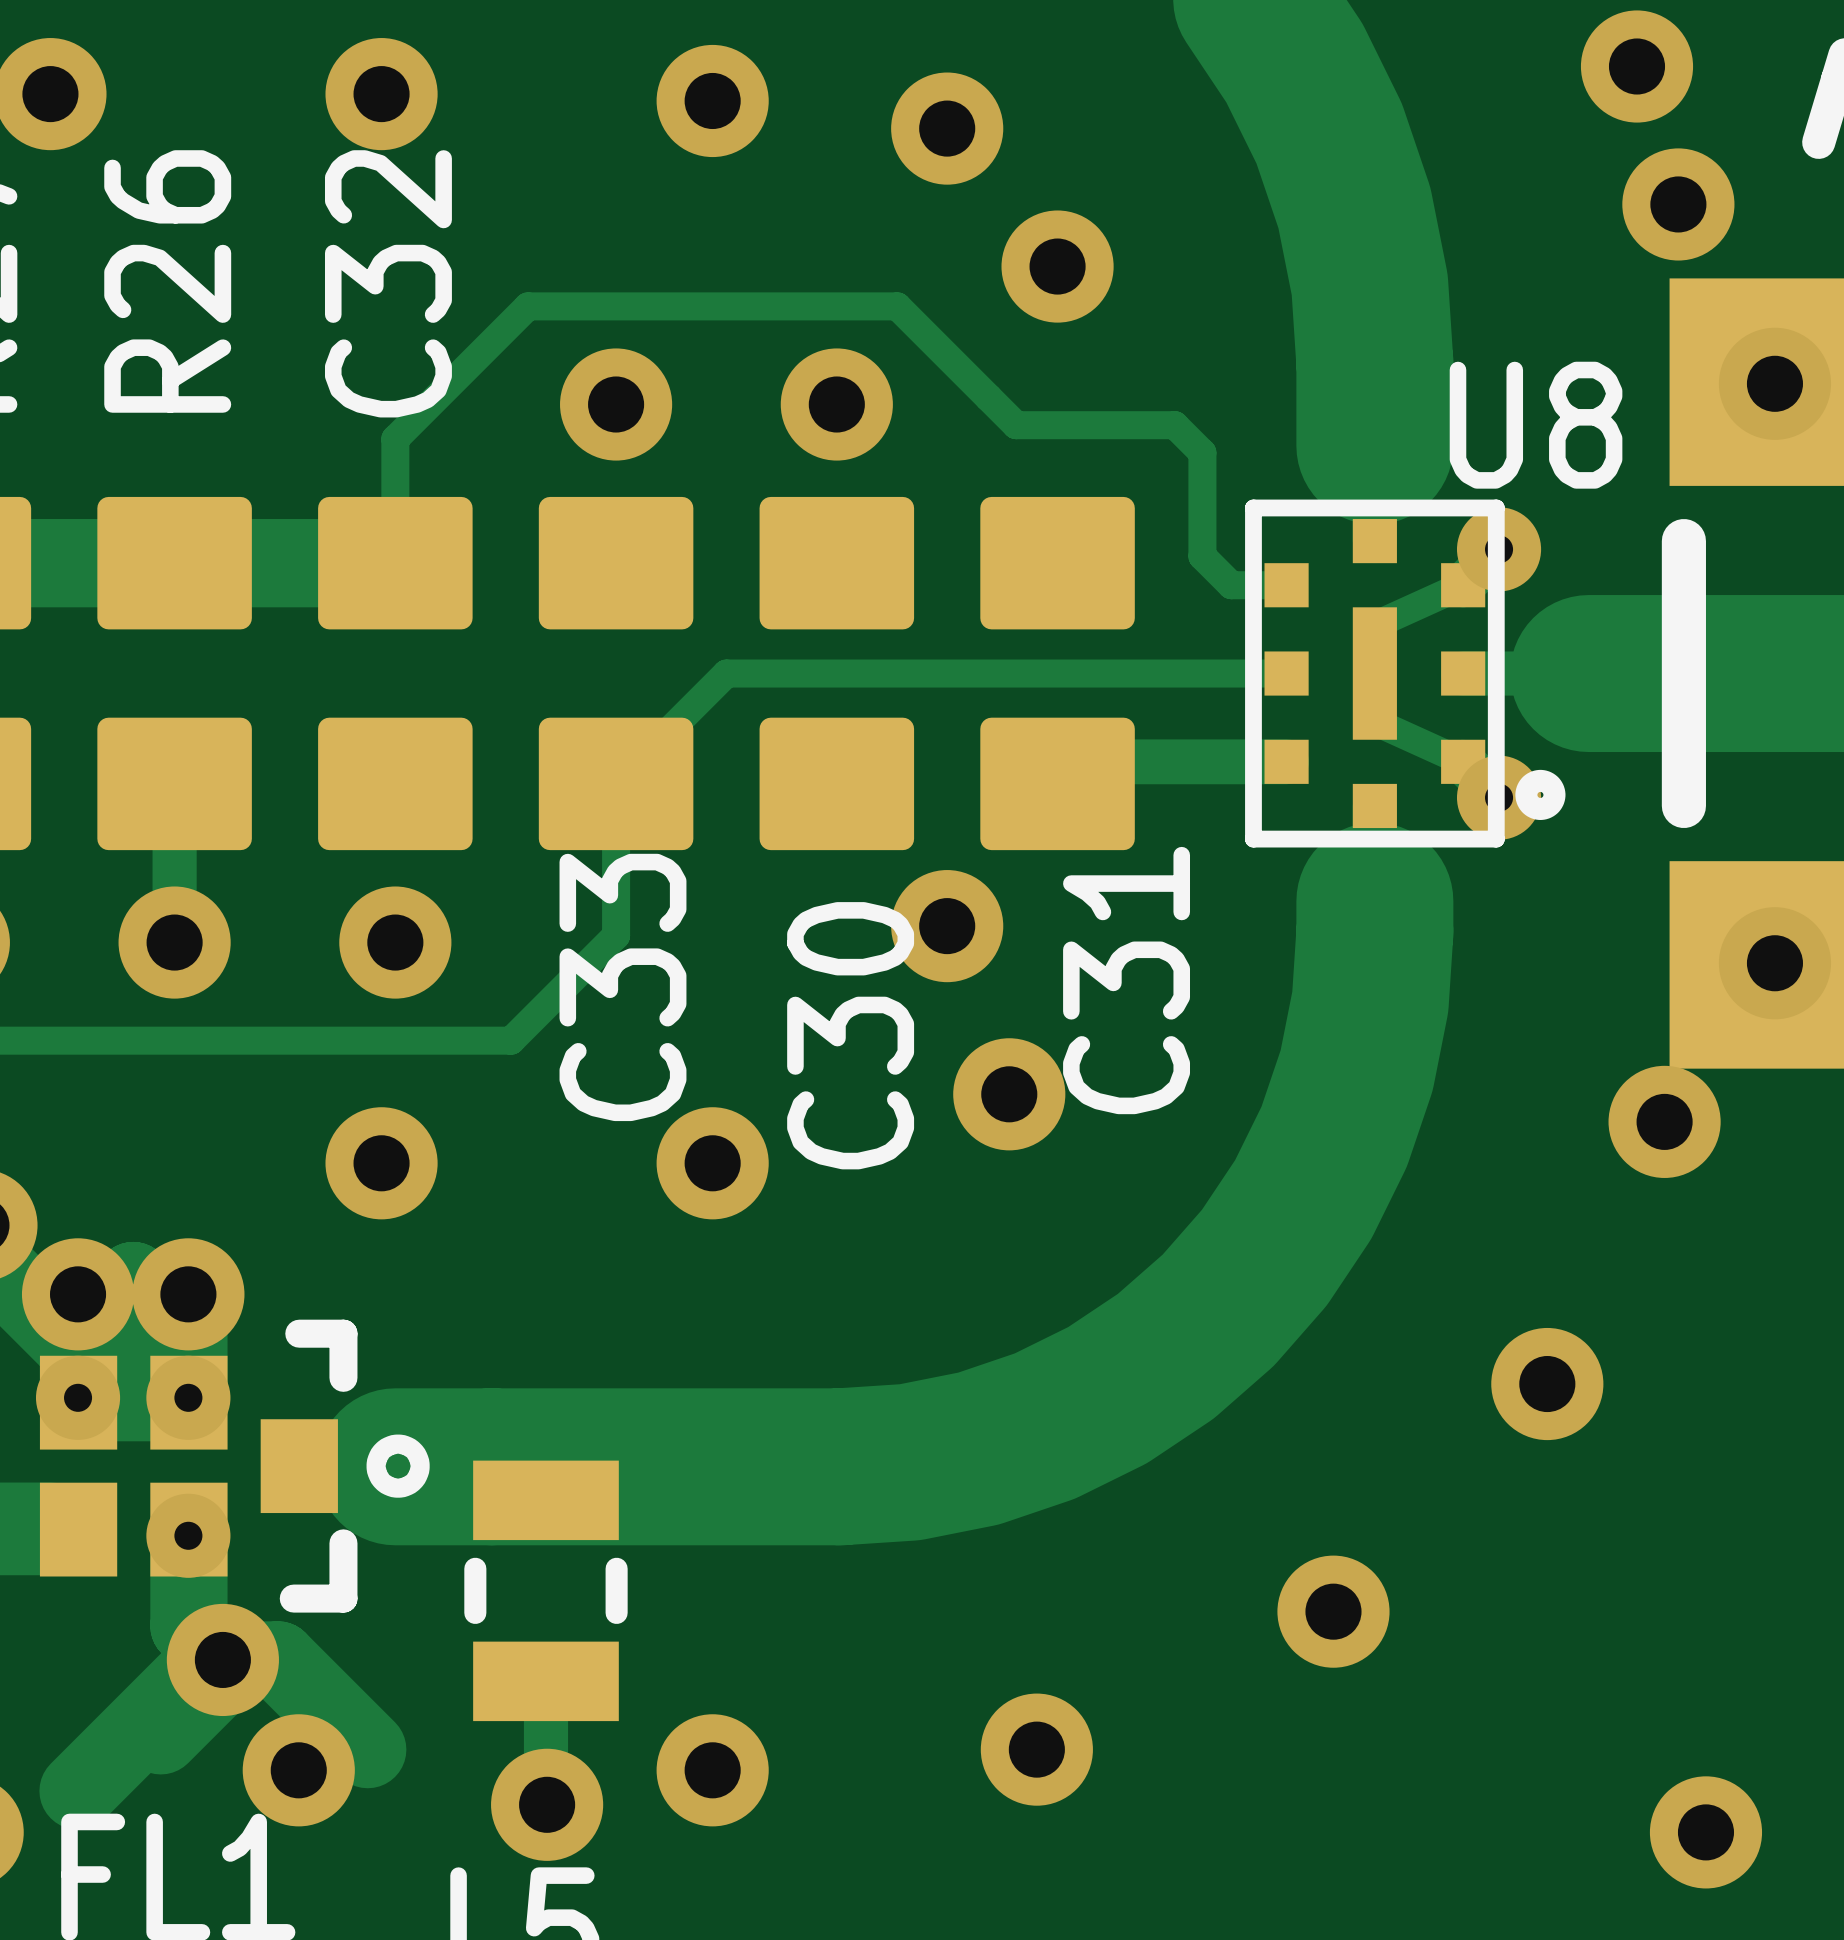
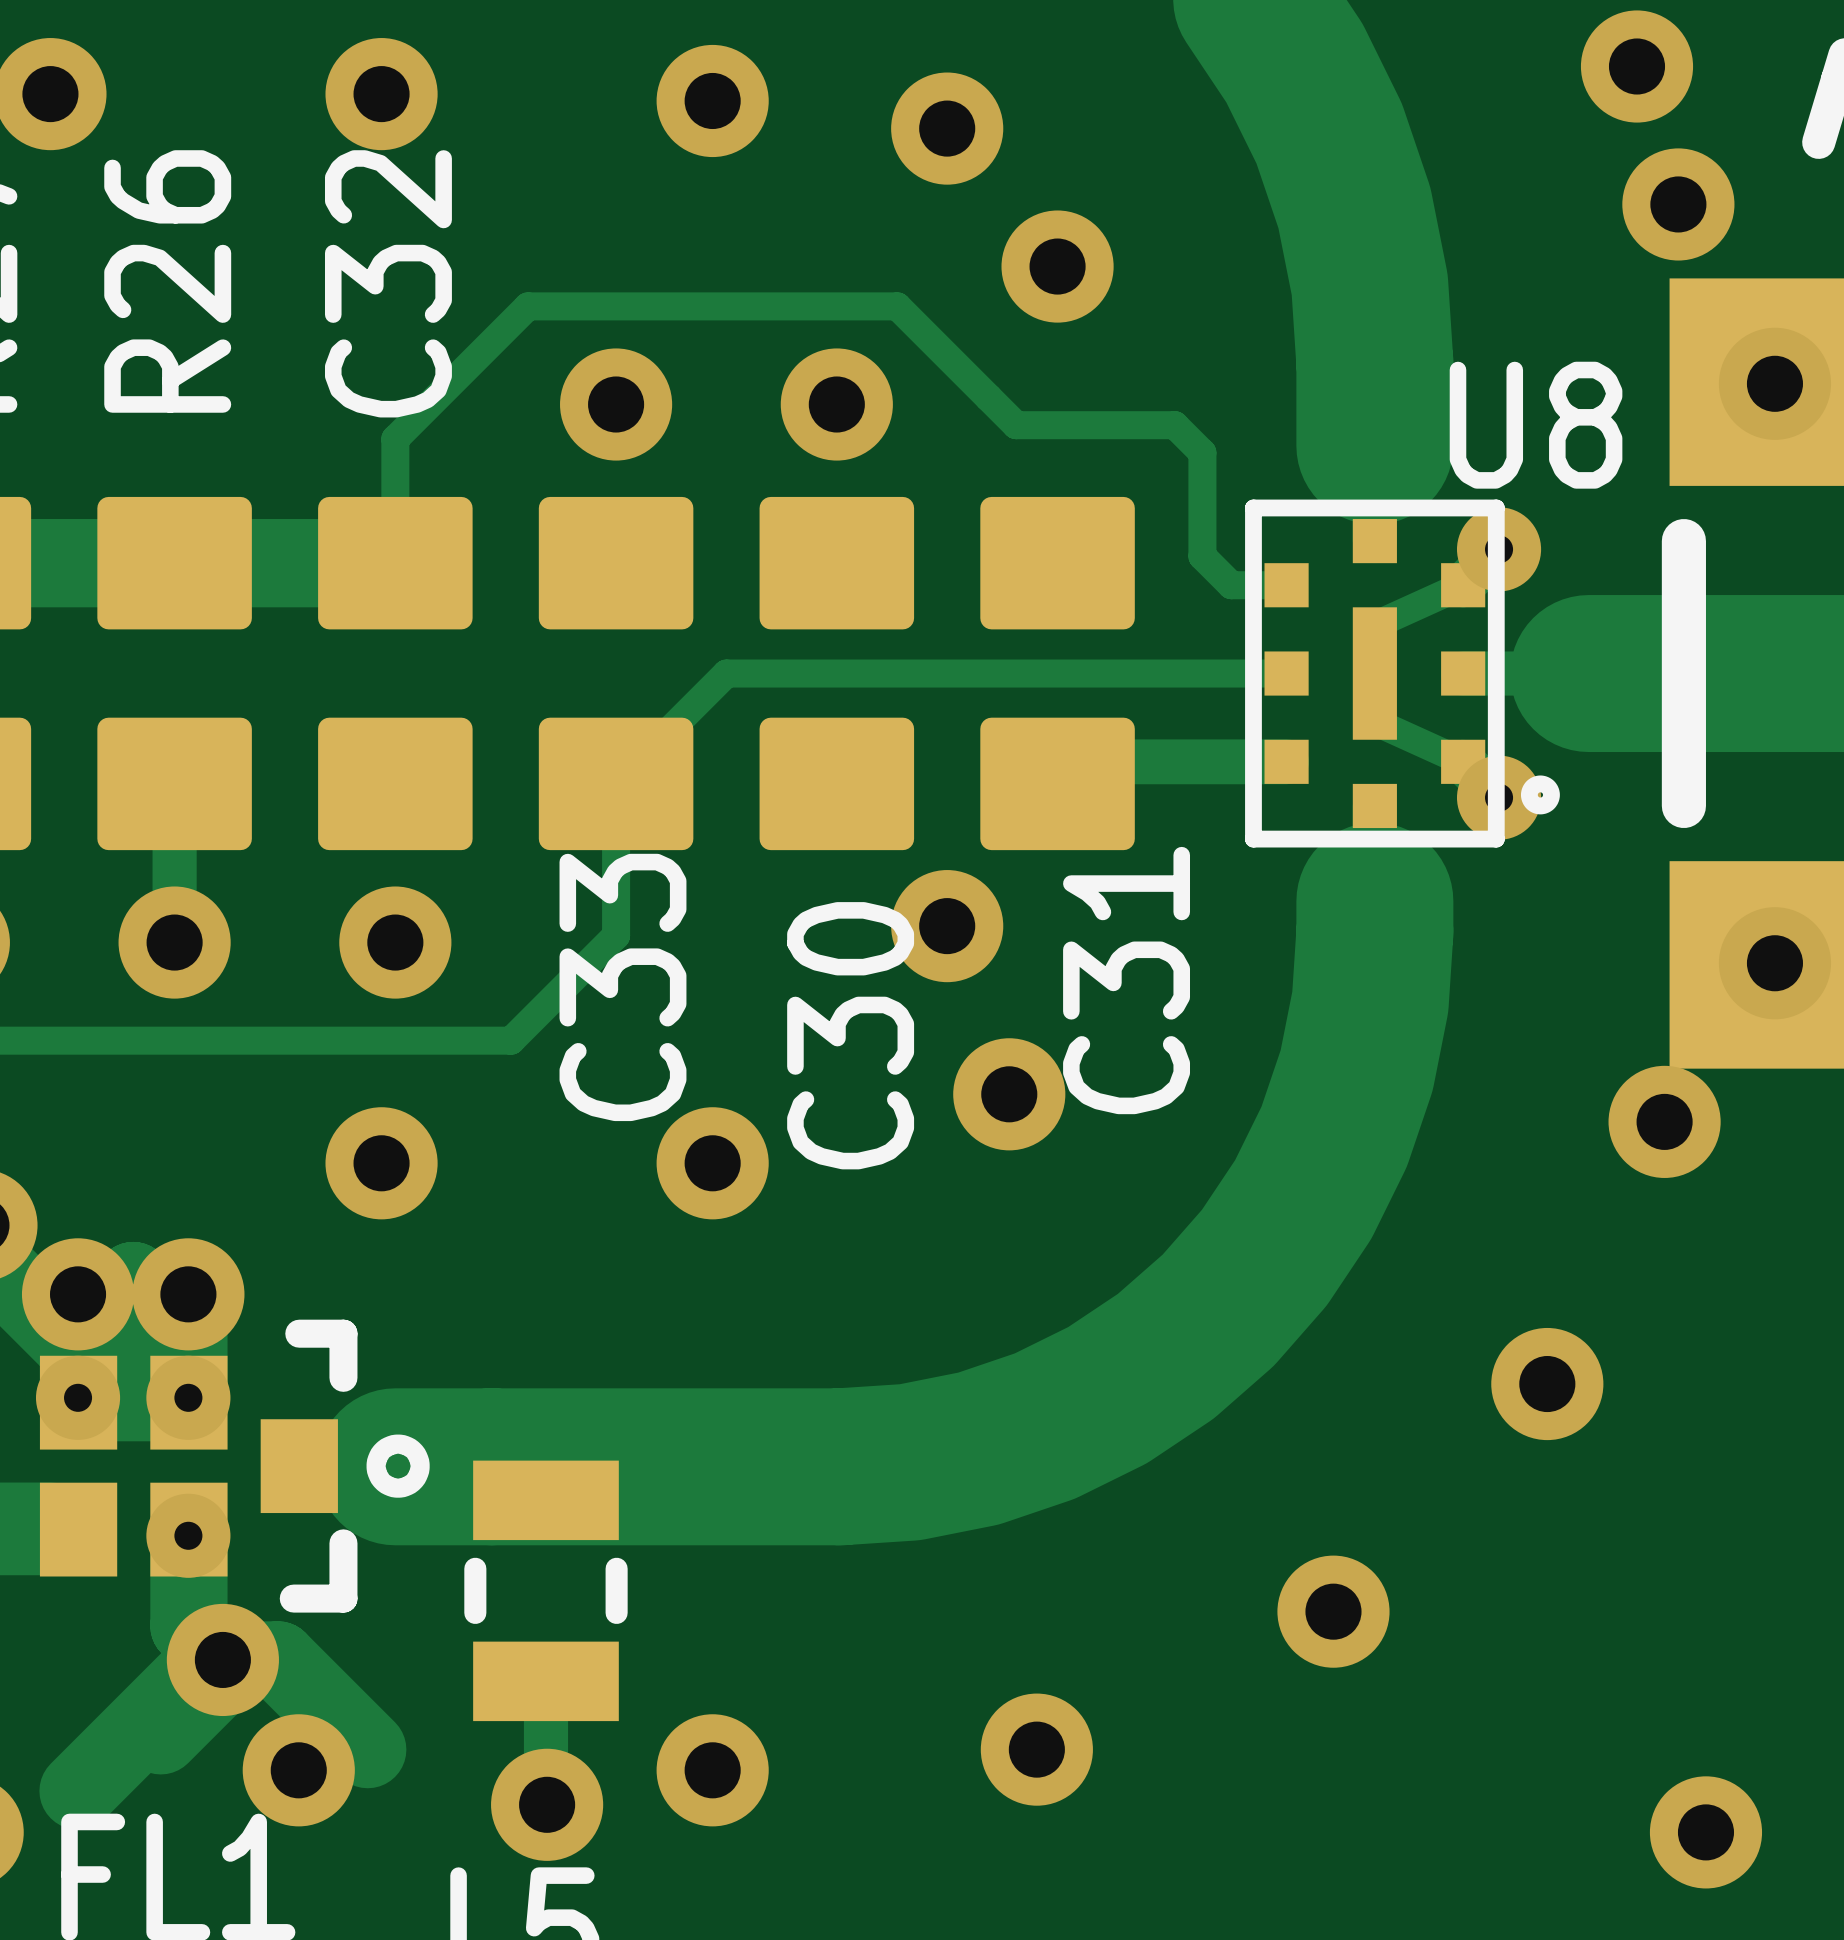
U8 footprint: [1245, 499, 1566, 848] -> [1245, 499, 1560, 848]

